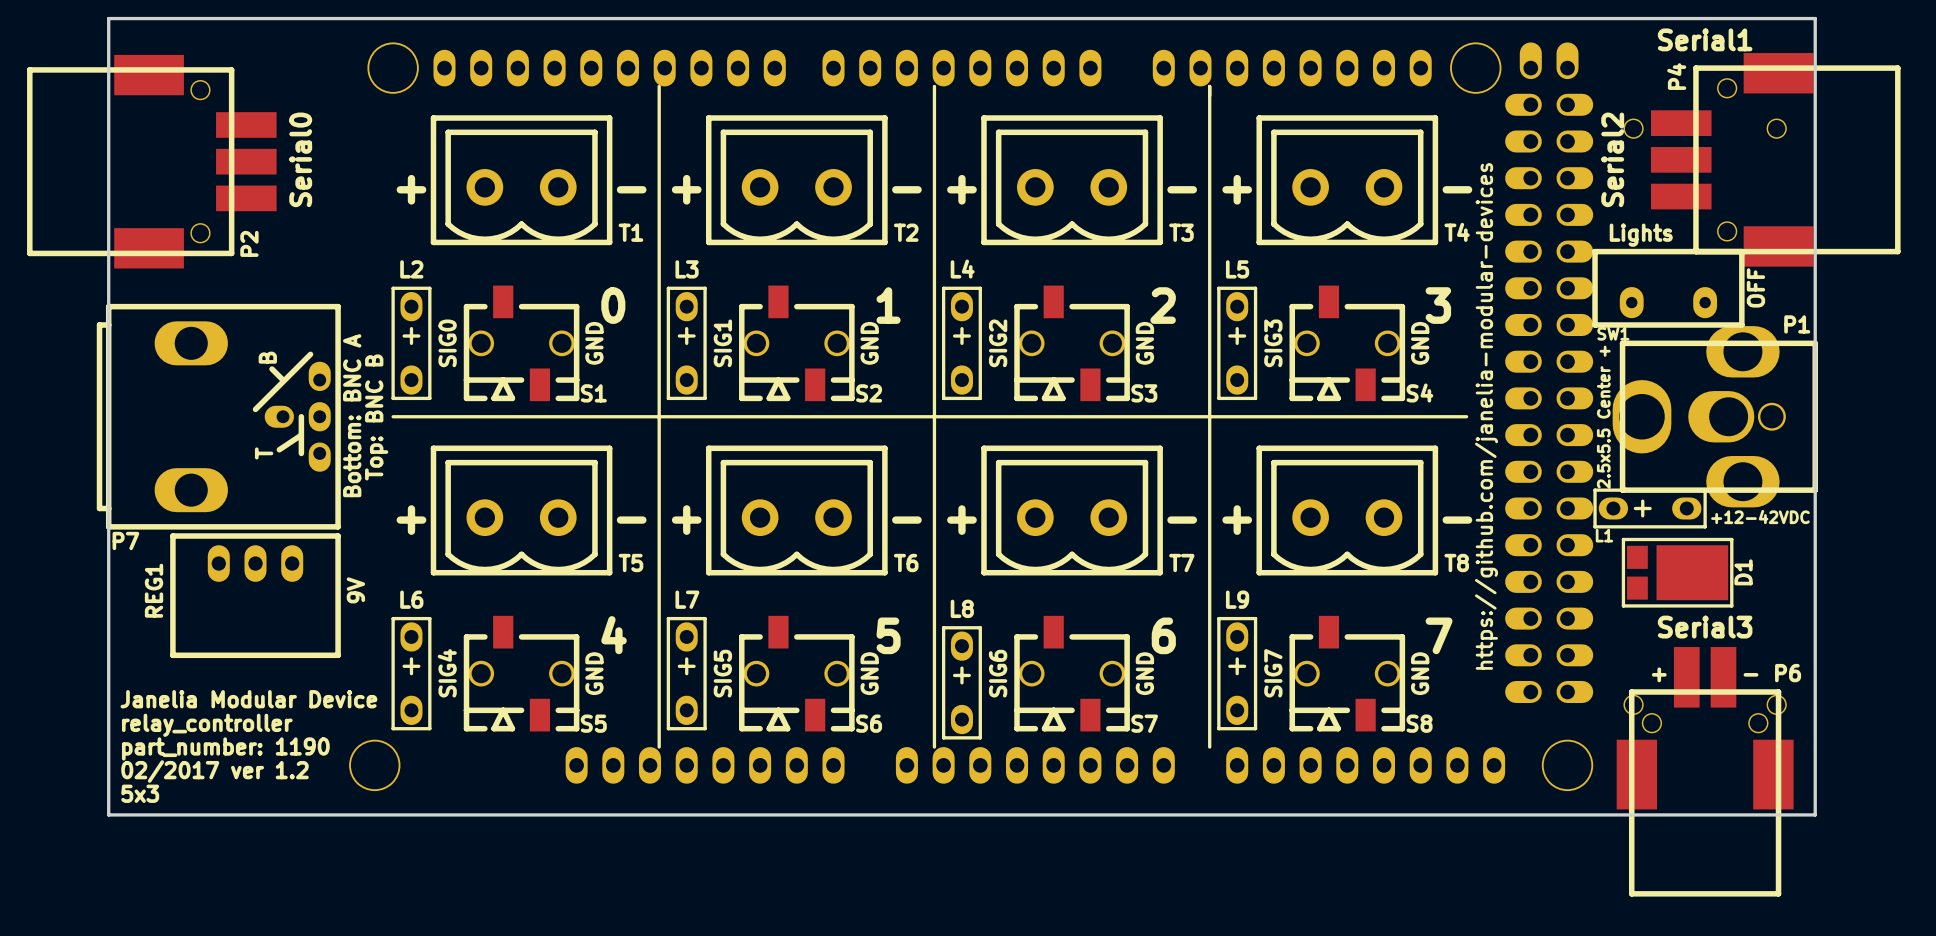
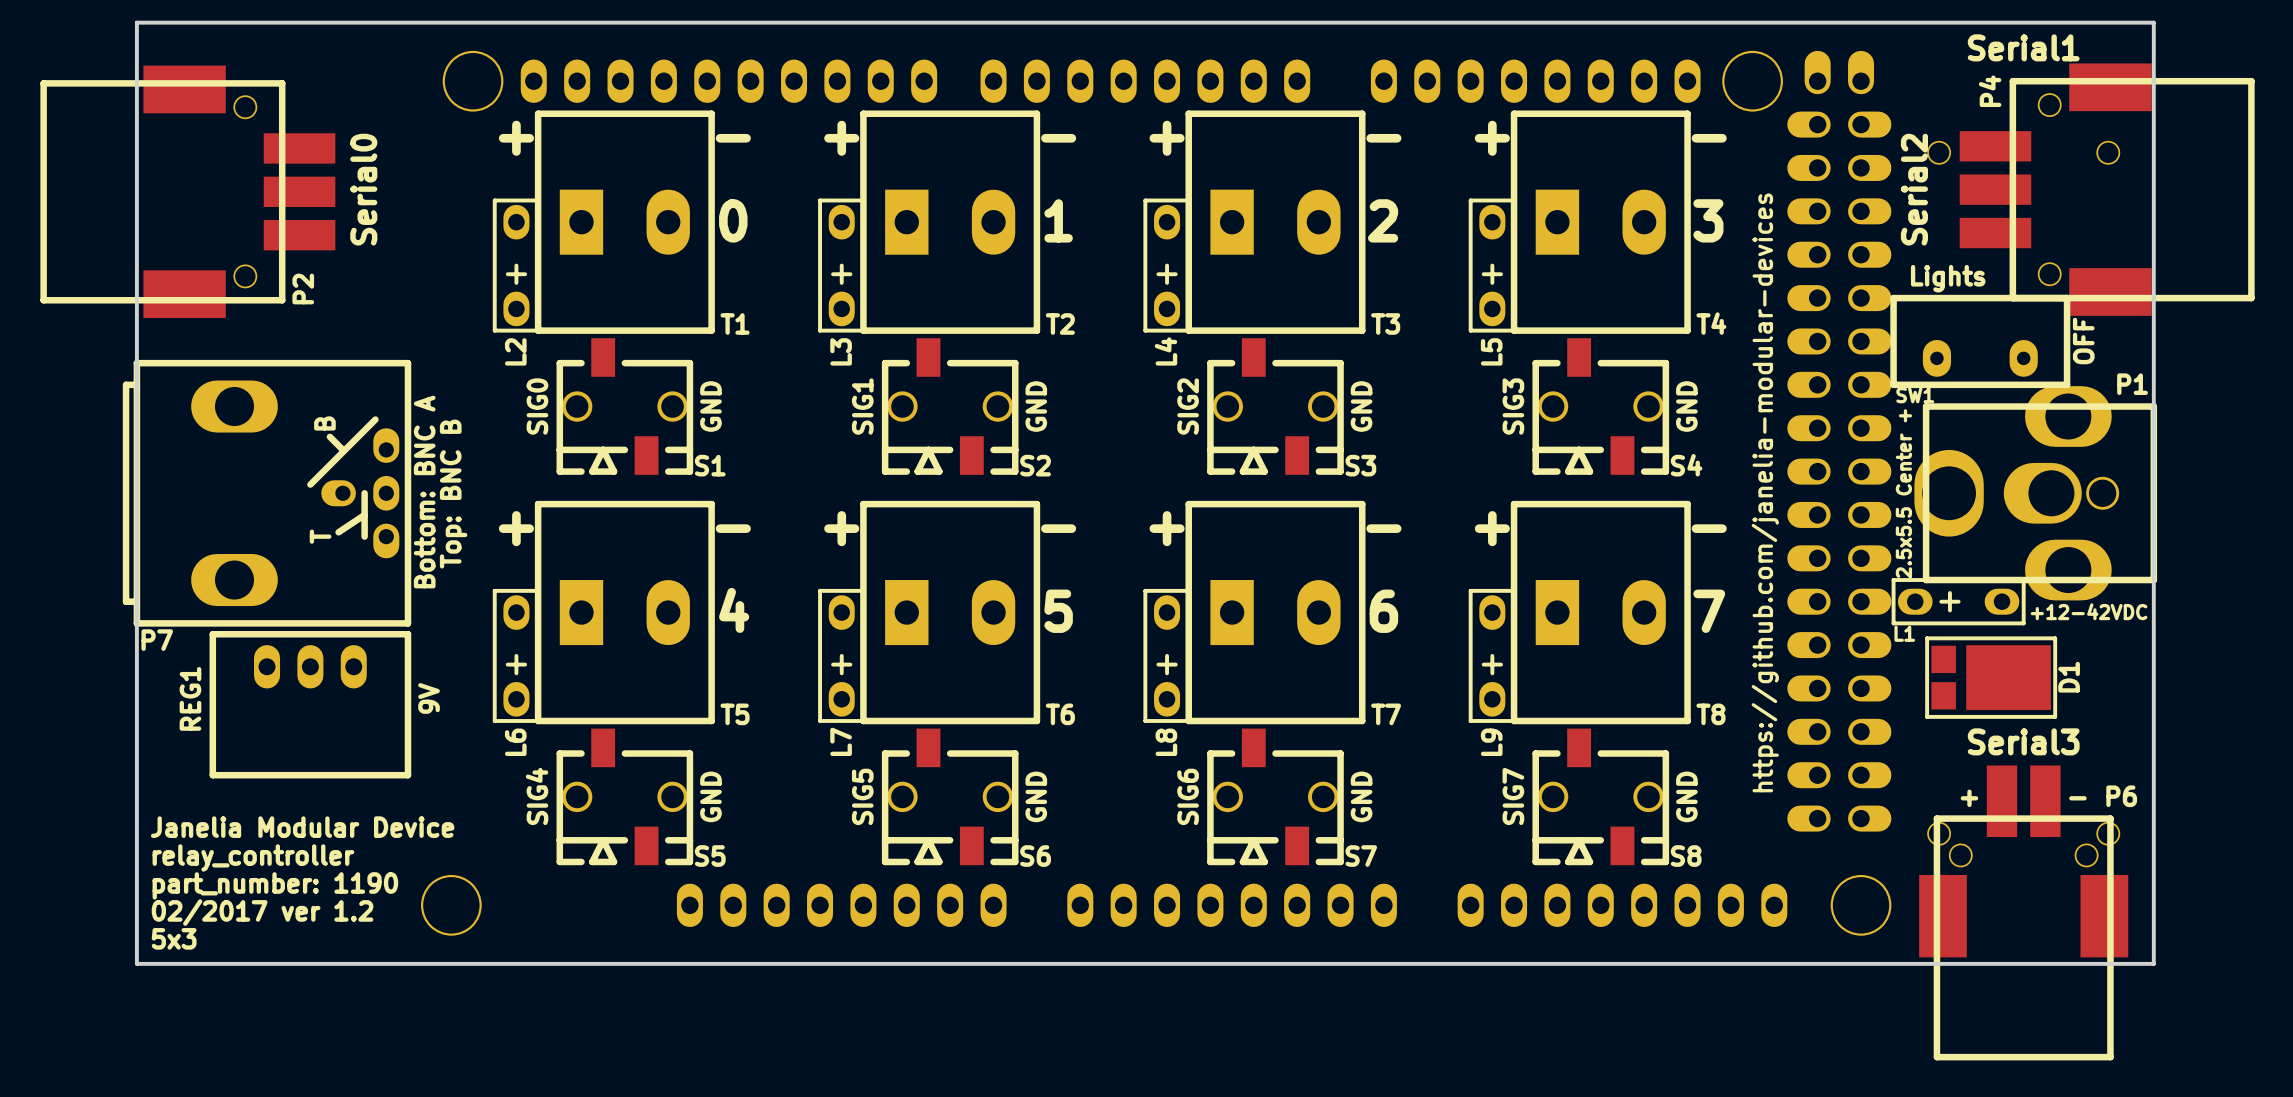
line: (659, 86) (659, 747) -> none
line: (934, 86) (934, 747) -> none
line: (1209, 86) (1209, 747) -> none
T1 footprint: [430, 115, 613, 246] -> [534, 110, 715, 334]
T2 footprint: [705, 115, 888, 246] -> [860, 110, 1041, 334]
T3 footprint: [981, 115, 1163, 246] -> [1185, 110, 1366, 334]
T4 footprint: [1256, 115, 1439, 246] -> [1510, 110, 1691, 334]
text position: + (411, 189) -> + (516, 138)
text position: - (631, 189) -> - (733, 138)
text position: + (686, 189) -> + (841, 138)
text position: - (906, 189) -> - (1058, 138)
text position: + (961, 189) -> + (1167, 138)
text position: - (1182, 189) -> - (1383, 138)
text position: + (1237, 189) -> + (1492, 138)
text position: - (1457, 189) -> - (1709, 138)
T1 name position: T1 (630, 232) -> T1 (735, 323)
T2 name position: T2 (906, 232) -> T2 (1060, 323)
T3 name position: T3 (1181, 232) -> T3 (1385, 323)
T4 name position: T4 (1457, 232) -> T4 (1711, 323)
text position: 0 (613, 305) -> 0 (733, 220)
text position: 1 (888, 305) -> 1 (1058, 220)
text position: 2 (1163, 305) -> 2 (1383, 220)
text position: 3 (1438, 305) -> 3 (1708, 220)
L2 rotation: 0° (411, 343) -> 180° (516, 265)
L2 position: (411, 343) -> (516, 265)
L3 rotation: 0° (686, 343) -> 180° (841, 265)
L3 position: (686, 343) -> (841, 265)
L4 rotation: 0° (961, 343) -> 180° (1167, 265)
L4 position: (961, 343) -> (1167, 265)
L5 rotation: 0° (1237, 343) -> 180° (1492, 265)
L5 position: (1237, 343) -> (1492, 265)
line: (393, 416) (1466, 416) -> none
T5 footprint: [430, 445, 613, 576] -> [534, 500, 715, 725]
T6 footprint: [705, 445, 888, 576] -> [860, 500, 1041, 725]
T7 footprint: [981, 445, 1163, 576] -> [1185, 500, 1366, 725]
T8 footprint: [1256, 445, 1439, 576] -> [1510, 500, 1691, 725]
text position: + (411, 520) -> + (516, 528)
text position: - (631, 520) -> - (733, 528)
text position: + (686, 520) -> + (841, 528)
text position: - (906, 520) -> - (1058, 528)
text position: + (961, 520) -> + (1167, 528)
text position: - (1182, 520) -> - (1383, 528)
text position: + (1237, 520) -> + (1492, 528)
text position: - (1457, 520) -> - (1709, 528)
T5 name position: T5 (630, 562) -> T5 (735, 714)
T6 name position: T6 (906, 562) -> T6 (1060, 714)
T7 name position: T7 (1181, 562) -> T7 (1386, 714)
T8 name position: T8 (1456, 562) -> T8 (1710, 714)
text position: 4 (614, 635) -> 4 (734, 610)
text position: 5 (888, 635) -> 5 (1058, 611)
text position: 6 (1163, 635) -> 6 (1383, 611)
text position: 7 (1439, 635) -> 7 (1709, 611)
L6 rotation: 0° (411, 673) -> 180° (516, 655)
L6 position: (411, 673) -> (516, 655)
L7 rotation: 0° (686, 673) -> 180° (841, 655)
L7 position: (686, 673) -> (841, 655)
L9 rotation: 0° (1237, 673) -> 180° (1492, 655)
L9 position: (1237, 673) -> (1492, 655)
L8 rotation: 0° (961, 682) -> 180° (1167, 655)
L8 position: (961, 682) -> (1167, 655)

